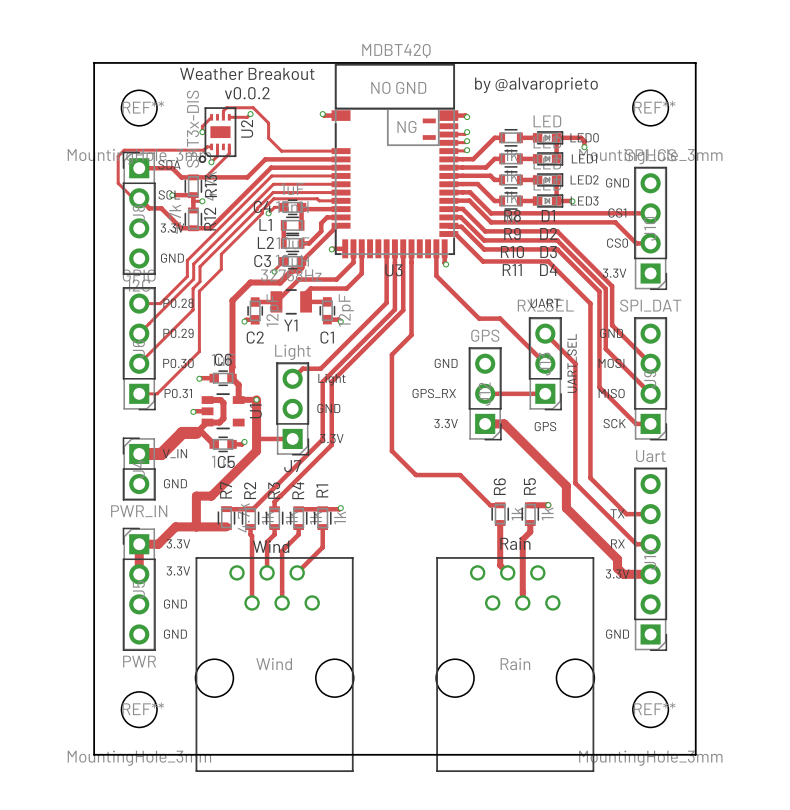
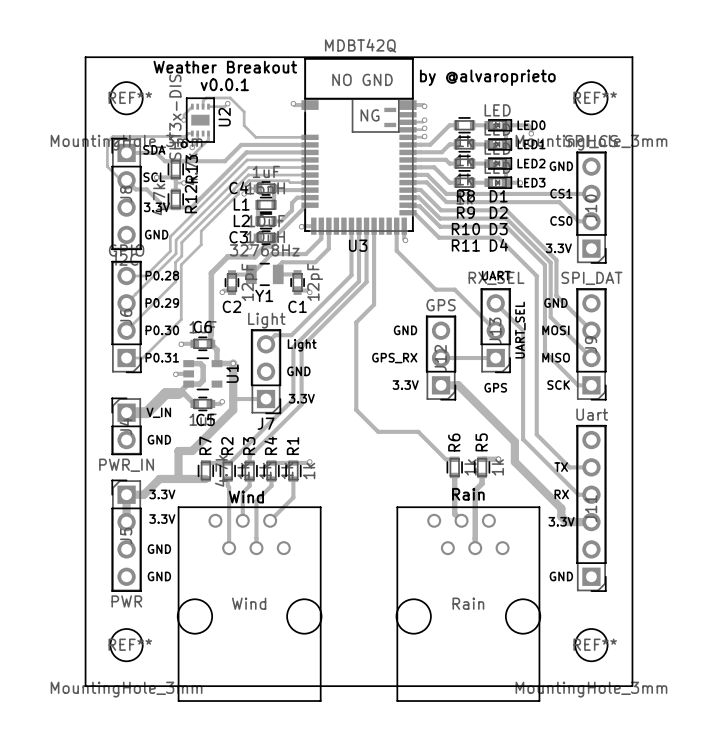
text: v0.0.2 (247, 93) -> v0.0.1 (224, 84)

